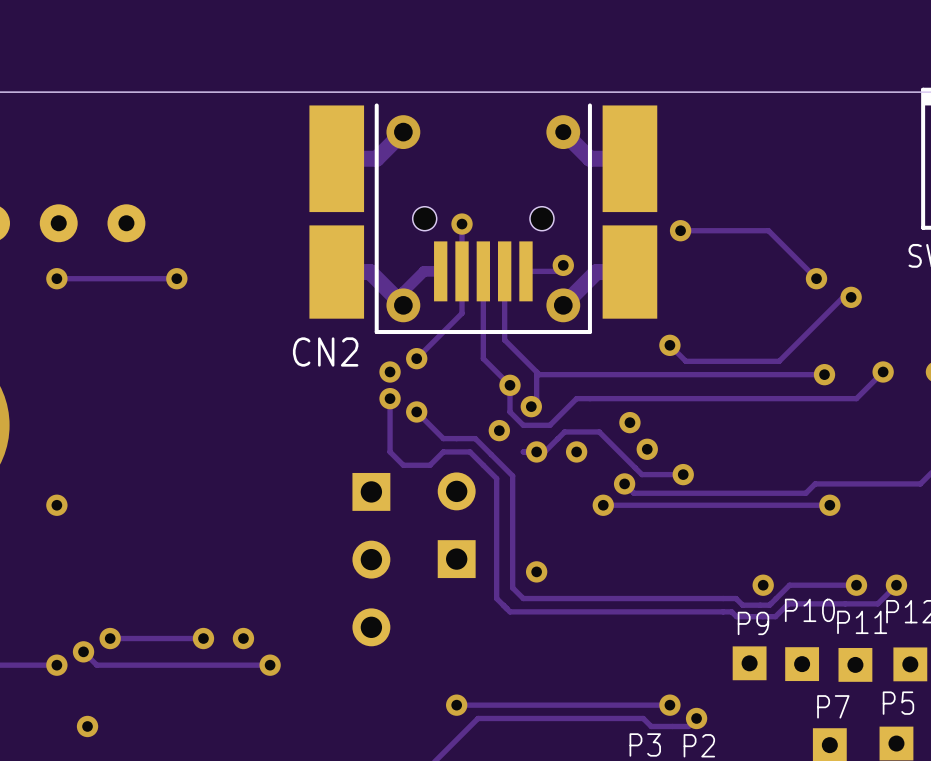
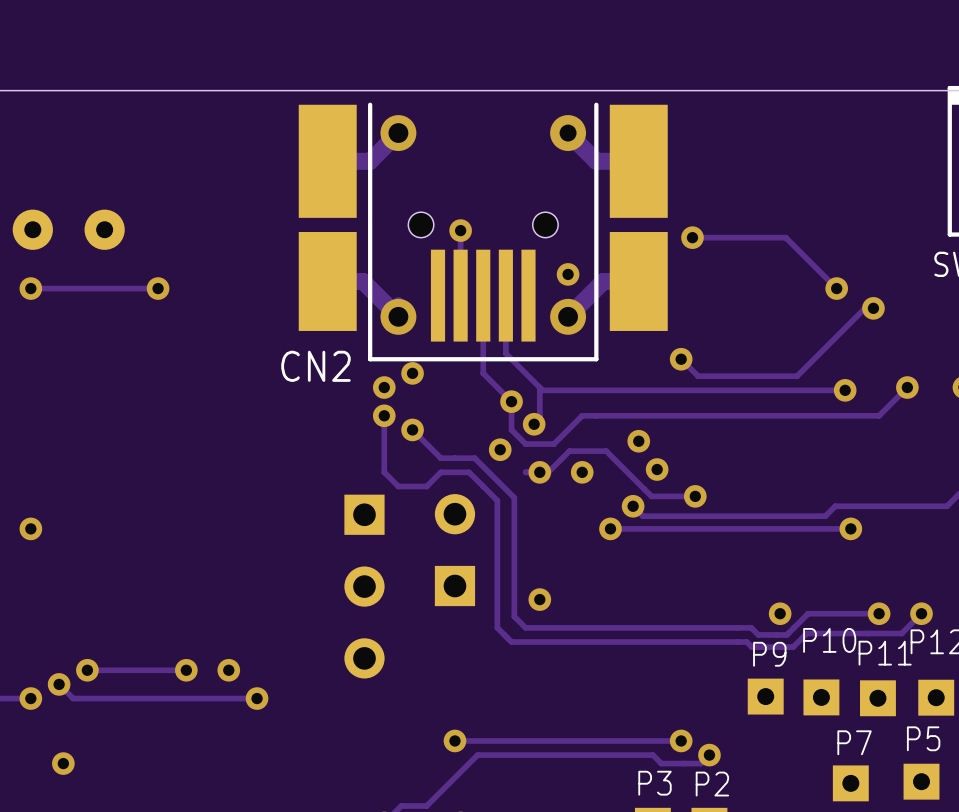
CN2 footprint: [309, 103, 658, 335] -> [298, 102, 668, 362]
track: (440, 271) (424, 271) (403, 292) -> none
track: (557, 271) (525, 271) -> none
track: (462, 313) (416, 358) -> none

